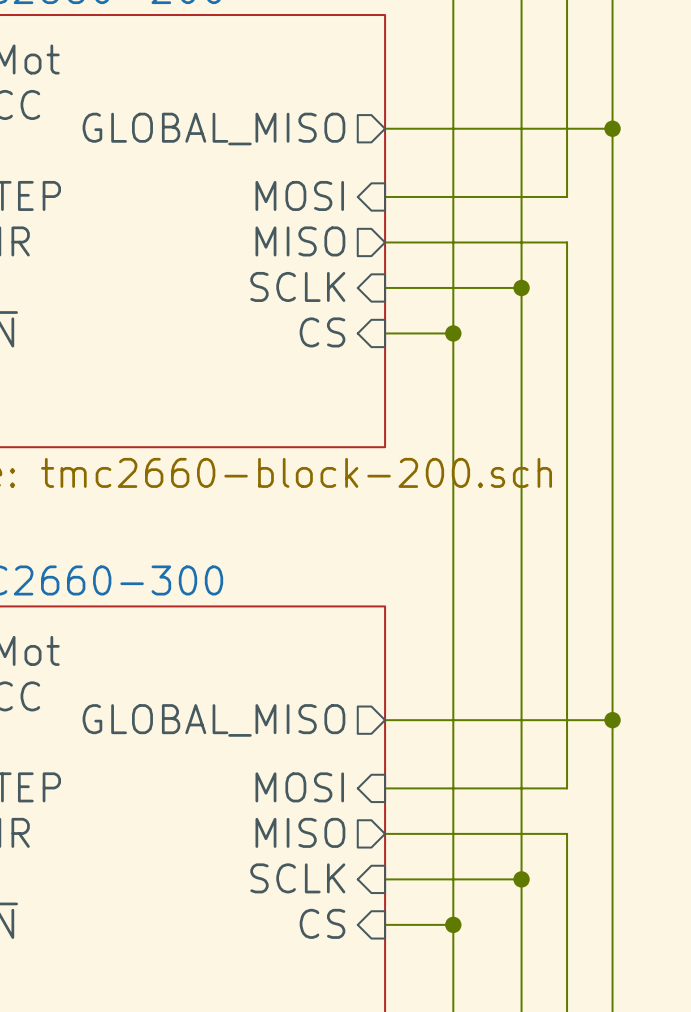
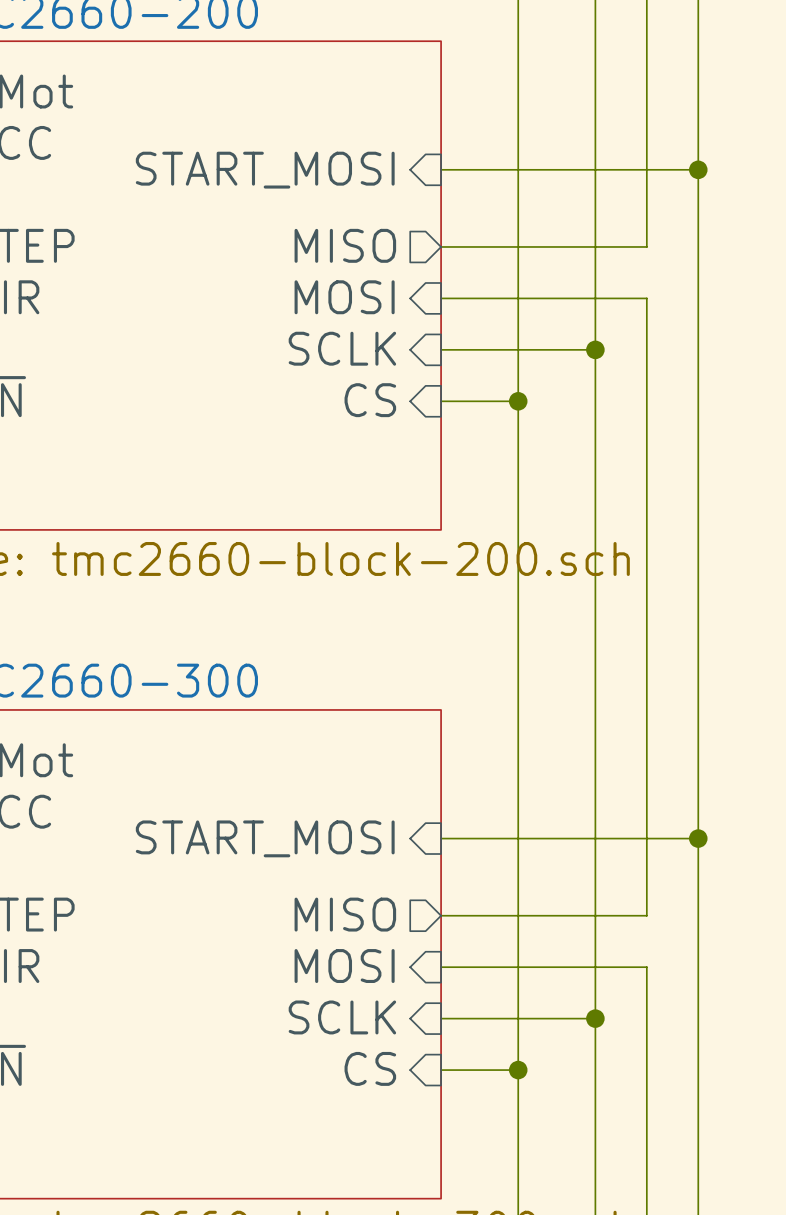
sheet pin shape: output (213, 129) -> input (265, 170)
sheet pin: GLOBAL_MISO (213, 129) -> START_MOSI (265, 170)
sheet pin shape: input (299, 195) -> output (345, 245)
sheet pin: MOSI (299, 195) -> MISO (345, 245)
sheet pin shape: output (300, 241) -> input (344, 297)
sheet pin: MISO (300, 241) -> MOSI (344, 297)
sheet pin shape: output (213, 720) -> input (265, 838)
sheet pin: GLOBAL_MISO (213, 720) -> START_MOSI (265, 838)
sheet pin shape: input (299, 787) -> output (345, 914)
sheet pin: MOSI (299, 787) -> MISO (345, 914)
sheet pin shape: output (300, 832) -> input (344, 966)
sheet pin: MISO (300, 832) -> MOSI (344, 966)

